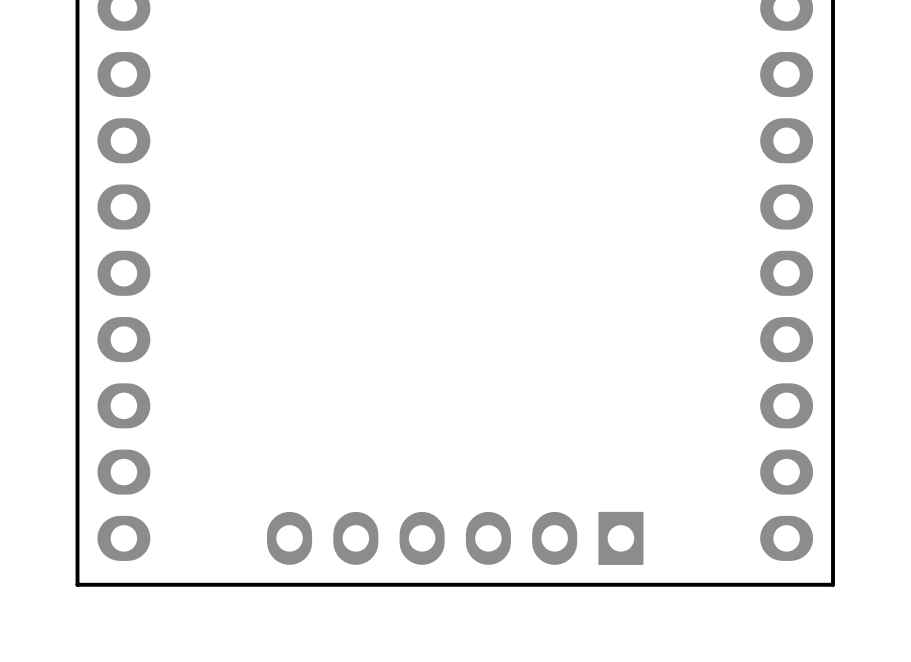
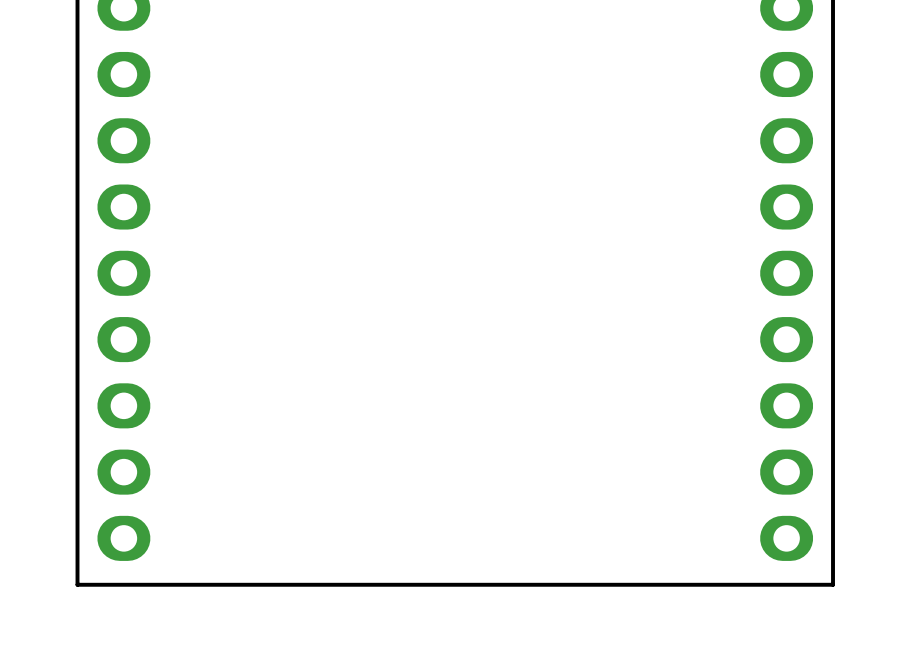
part: (455, 538) -> none

